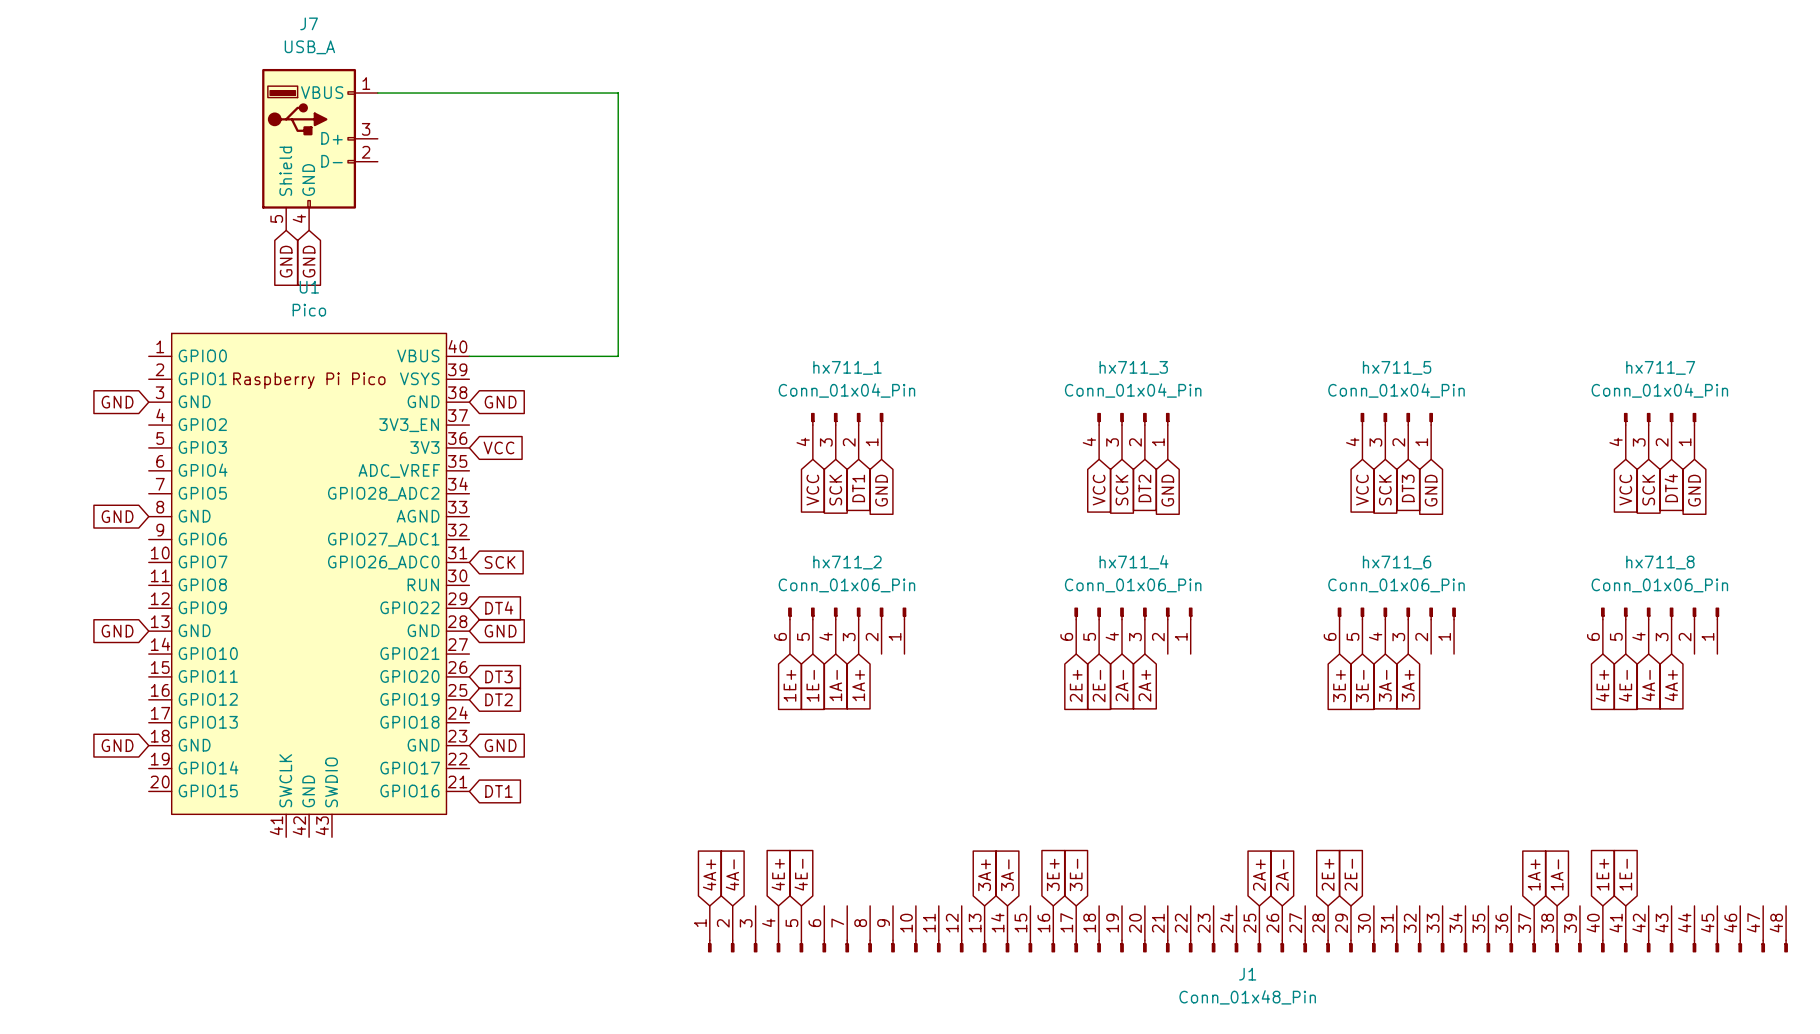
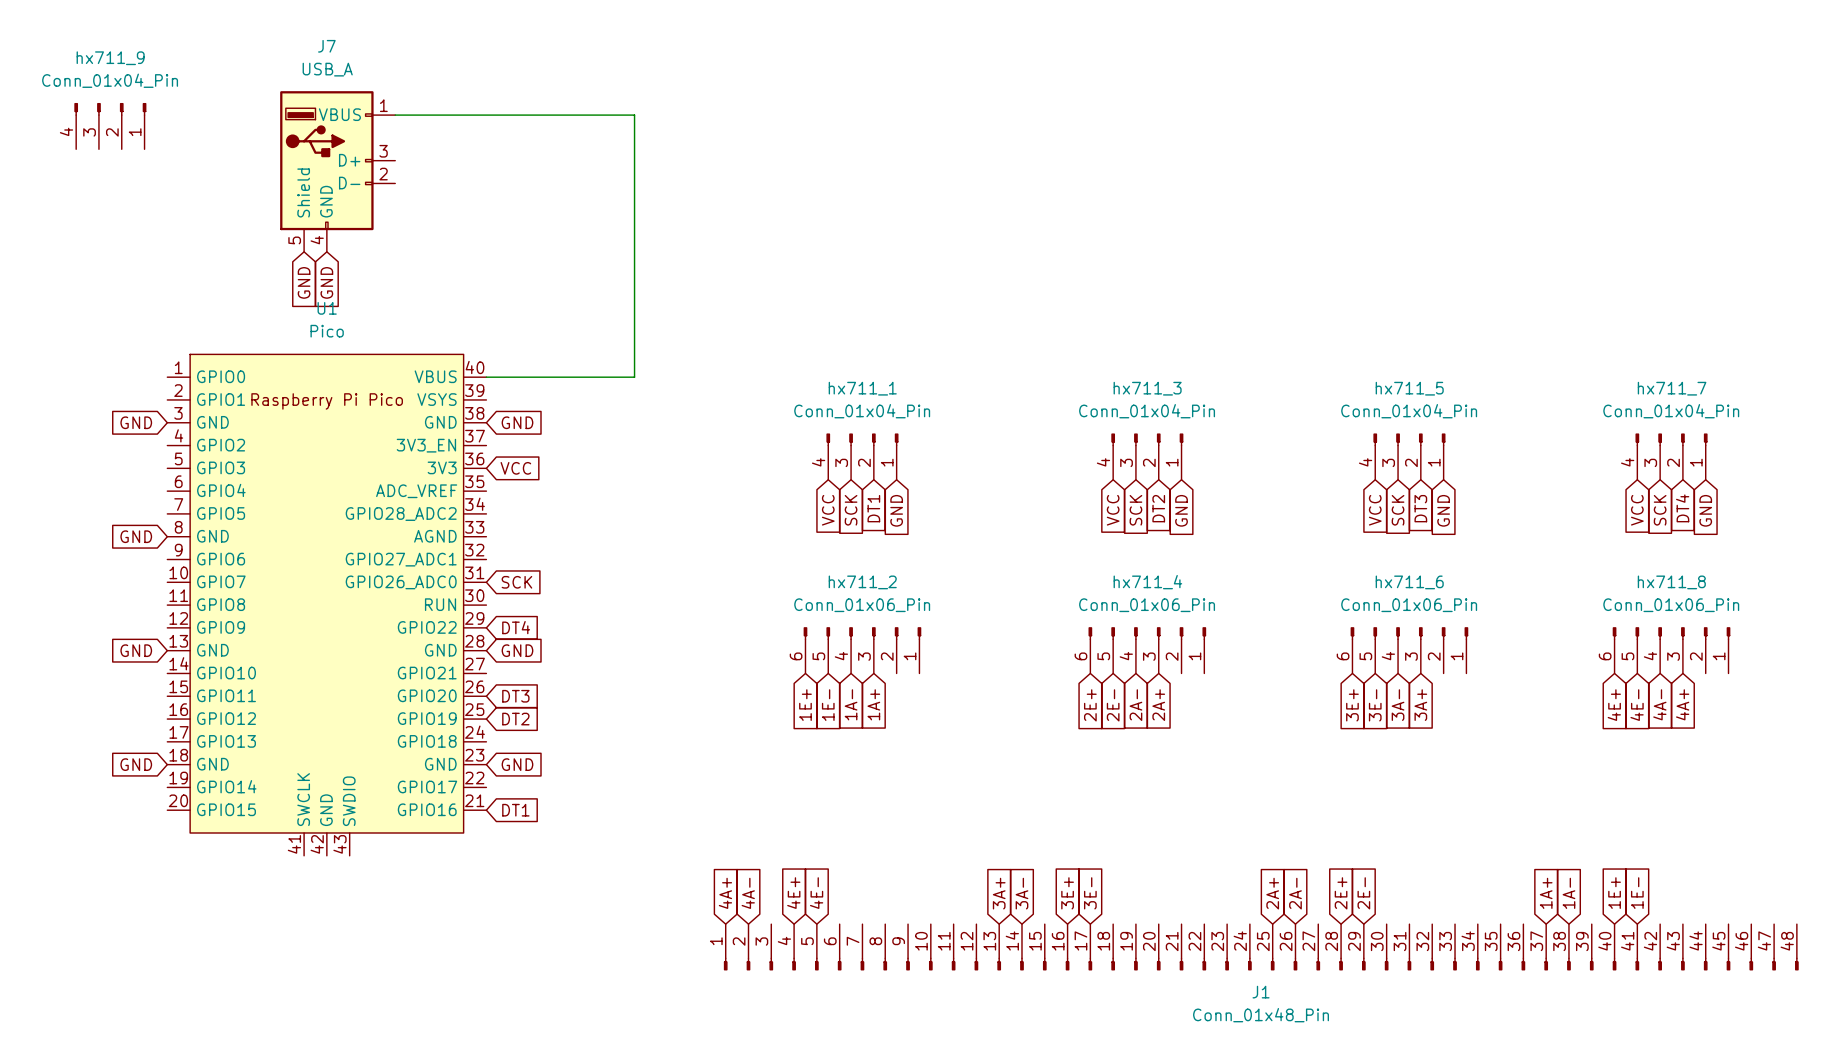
hx711_9: none -> Conn_01x04_Pin (110, 126)

